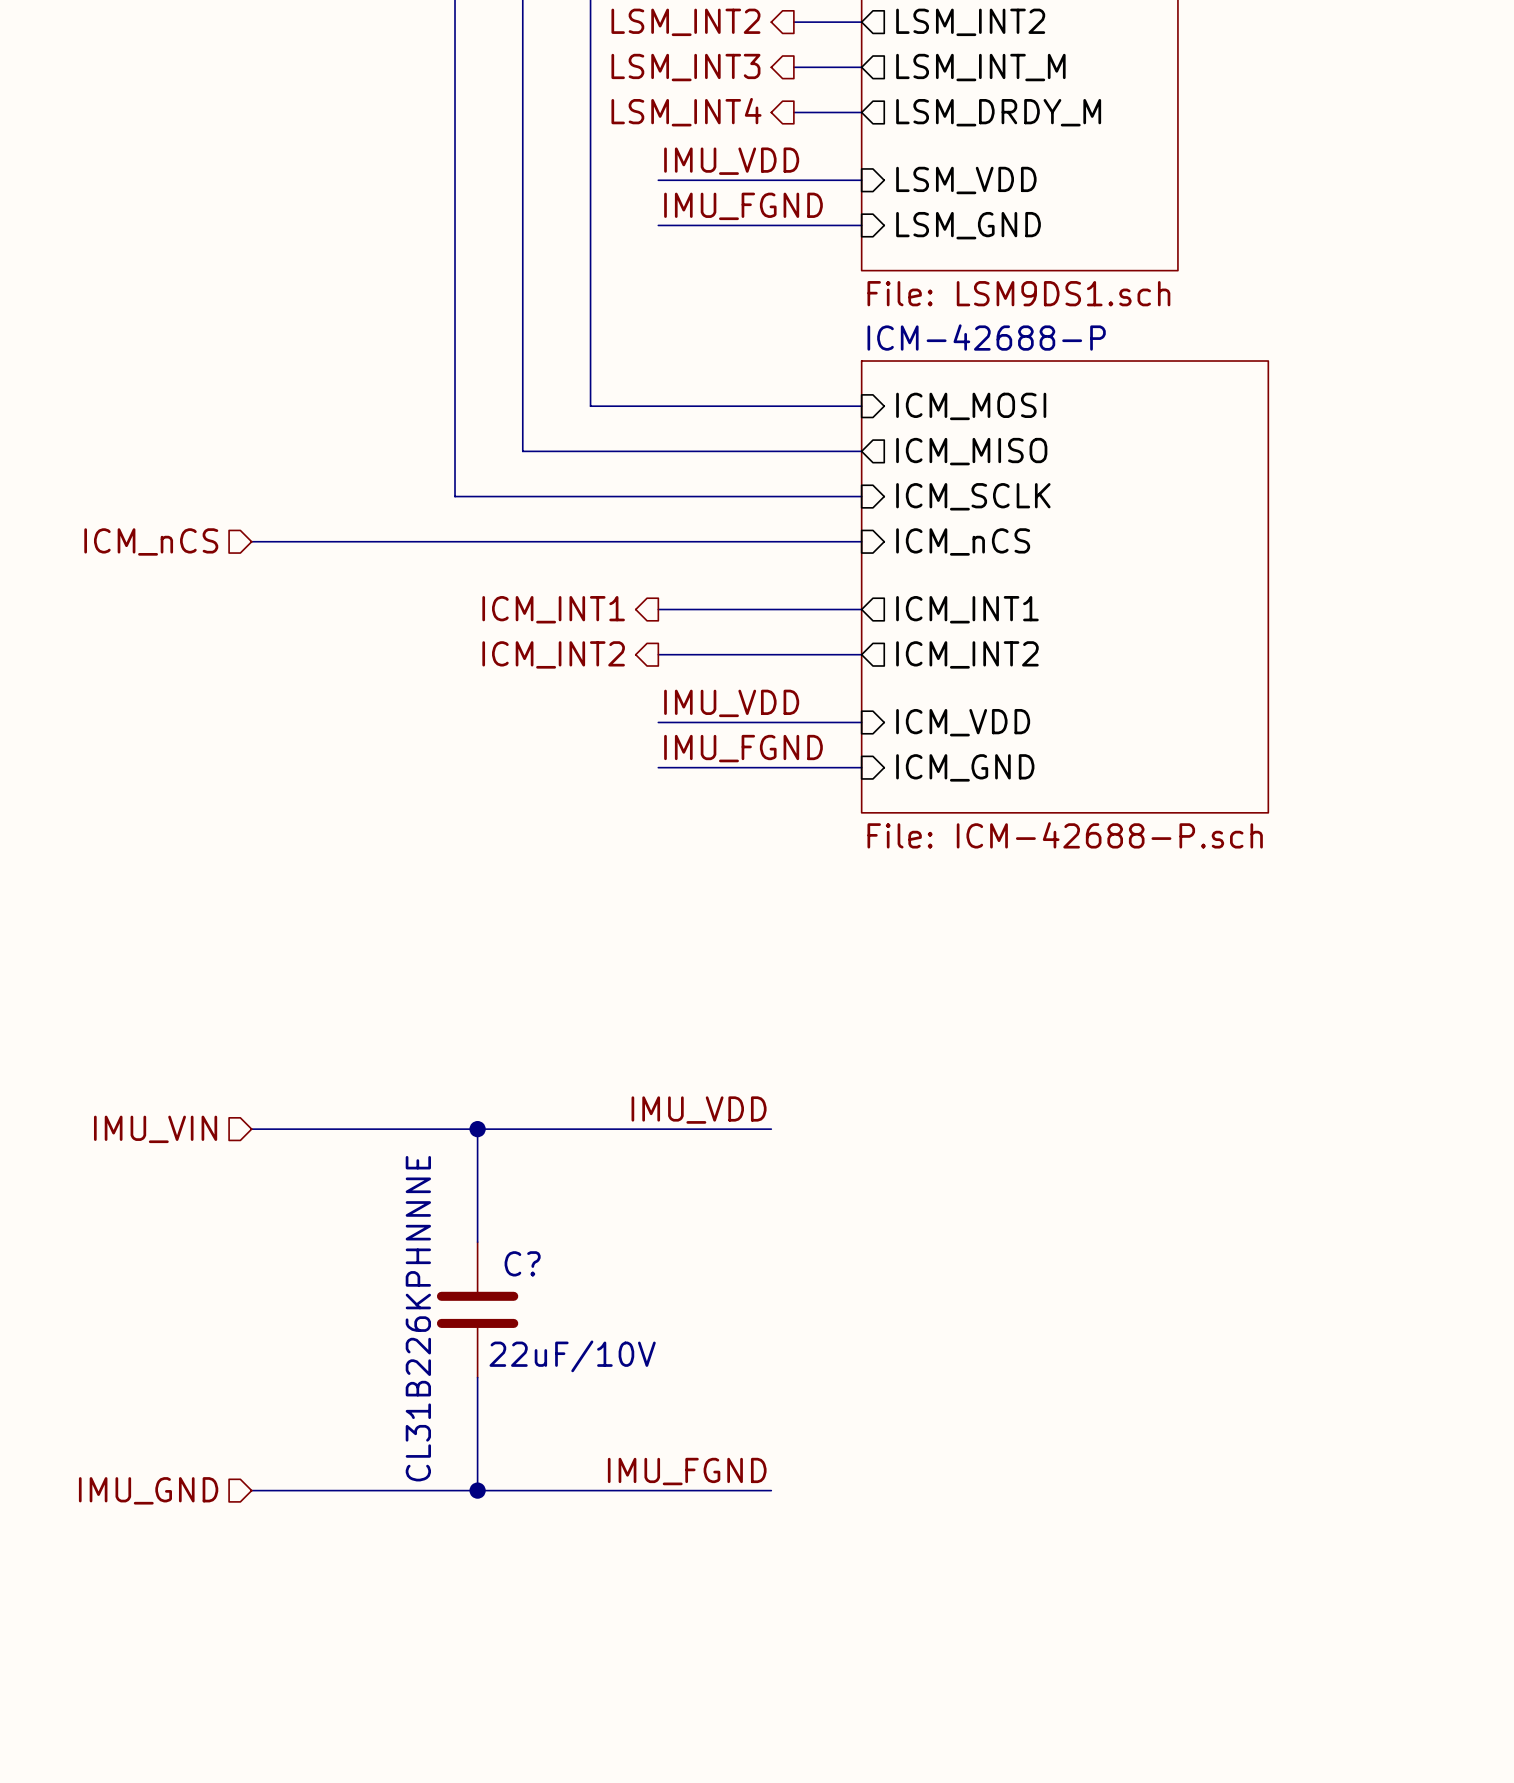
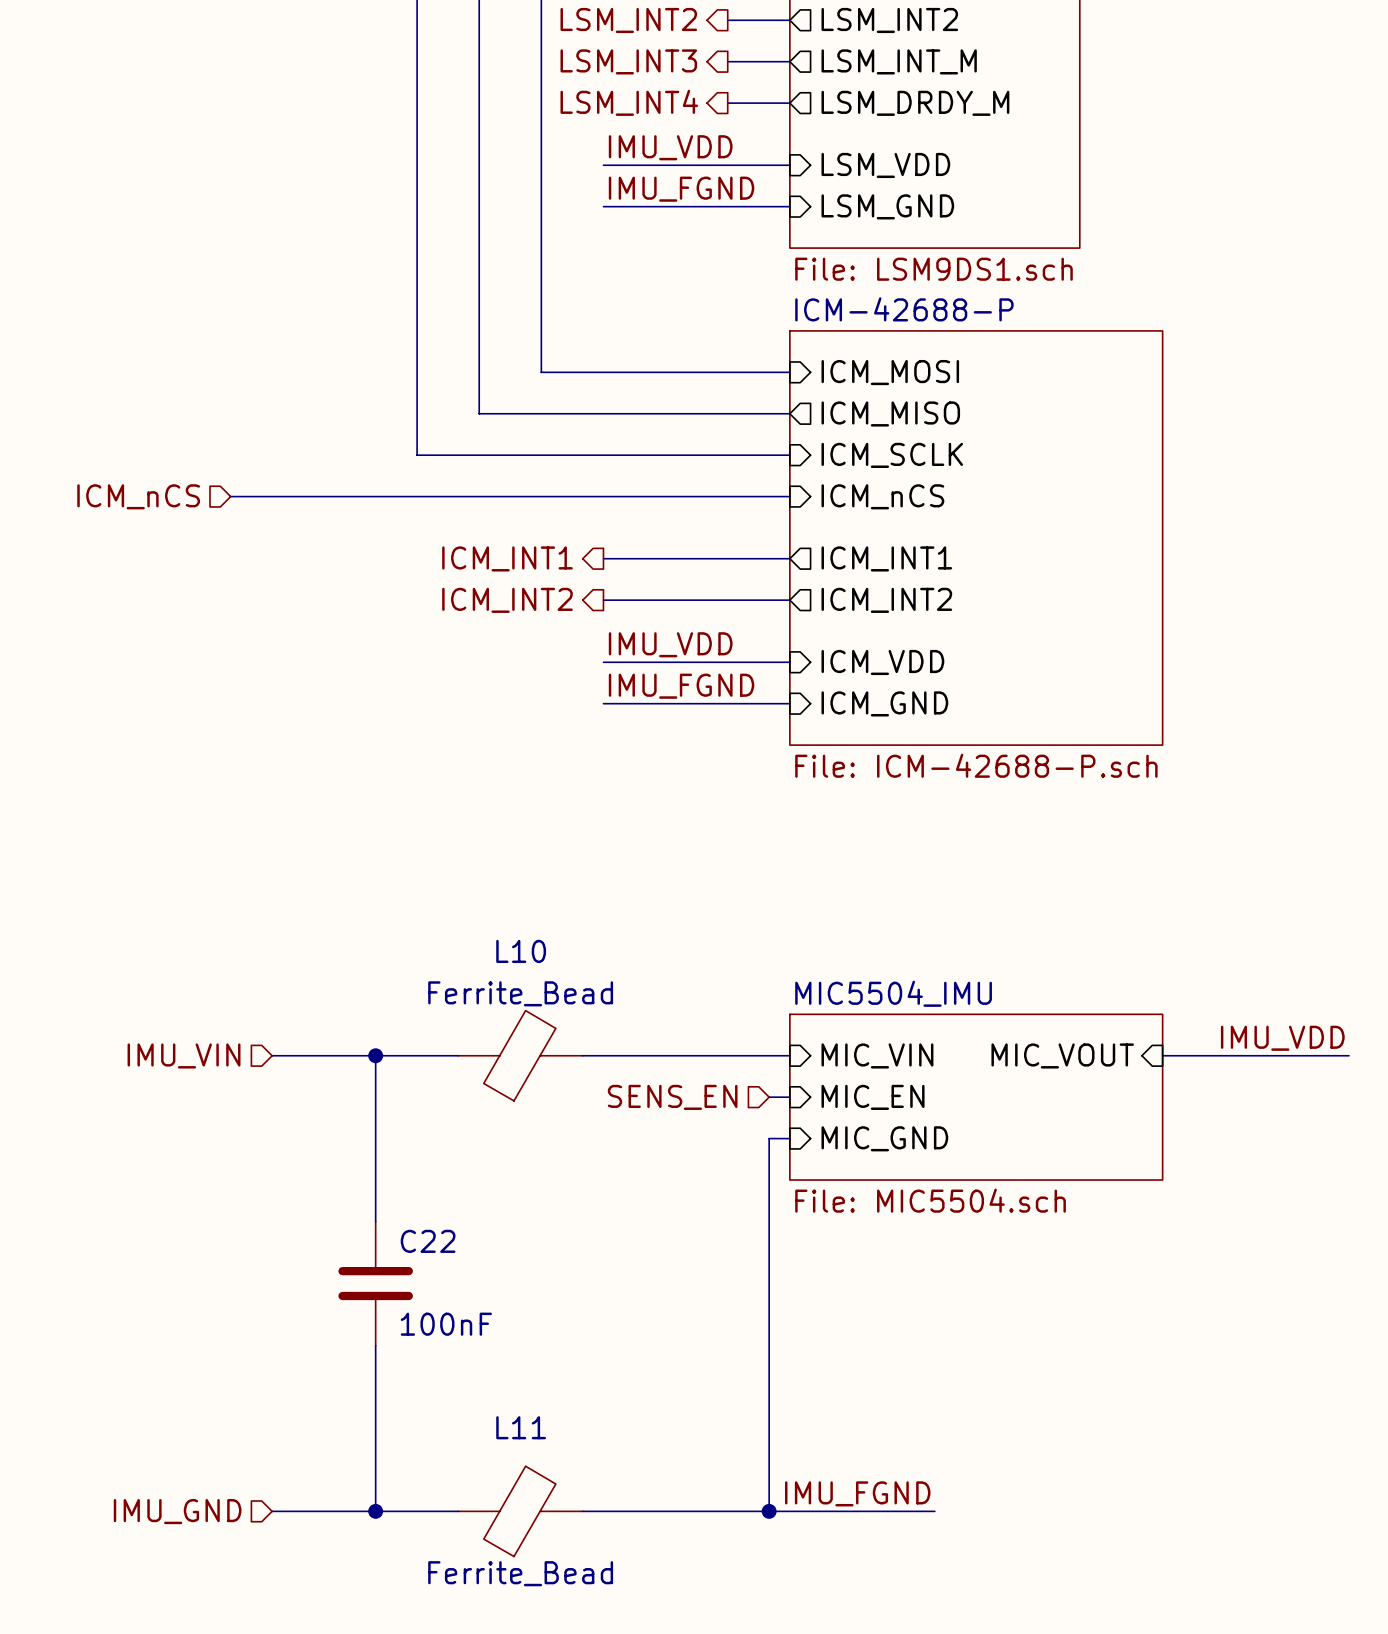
label: IMU_VDD (699, 1110) -> none
hierarchical label position: IMU_VIN (155, 1129) -> IMU_VIN (184, 1055)
wire: (251, 1129) (771, 1129) -> none
wire: (477, 1129) (477, 1242) -> none
junction position: (477, 1129) -> (375, 1055)
label: none -> IMU_VDD (1282, 1038)
wire: none -> (272, 1055) (458, 1055)
wire: none -> (375, 1055) (375, 1221)
L10: none -> Ferrite_Bead (520, 1055)
wire: none -> (582, 1055) (789, 1055)
sheet pin: none -> MIC_VIN (877, 1055)
sheet pin: none -> MIC_VOUT (1062, 1055)
wire: none -> (1162, 1055) (1349, 1055)
wire: none -> (769, 1097) (789, 1097)
sheet MIC5504_IMU: none -> File: MIC5504.sch (976, 1097)
hierarchical label: none -> SENS_EN (672, 1097)
sheet pin: none -> MIC_EN (873, 1097)
wire: none -> (789, 1138) (769, 1138) (769, 1511)
sheet pin: none -> MIC_GND (884, 1138)
C?: 22uF/10V (477, 1309) -> none
text: CL31B226KPHNNNE (418, 1318) -> none
wire: (477, 1377) (477, 1490) -> none
C22: none -> 100nF (375, 1283)
wire: none -> (375, 1345) (375, 1511)
label position: IMU_FGND (687, 1471) -> IMU_FGND (857, 1493)
hierarchical label position: IMU_GND (148, 1490) -> IMU_GND (177, 1511)
wire: (251, 1490) (771, 1490) -> none
junction: (477, 1490) -> none
wire: none -> (272, 1511) (458, 1511)
junction: none -> (375, 1511)
L11: none -> Ferrite_Bead (520, 1511)
wire: none -> (582, 1511) (934, 1511)
junction: none -> (769, 1511)

